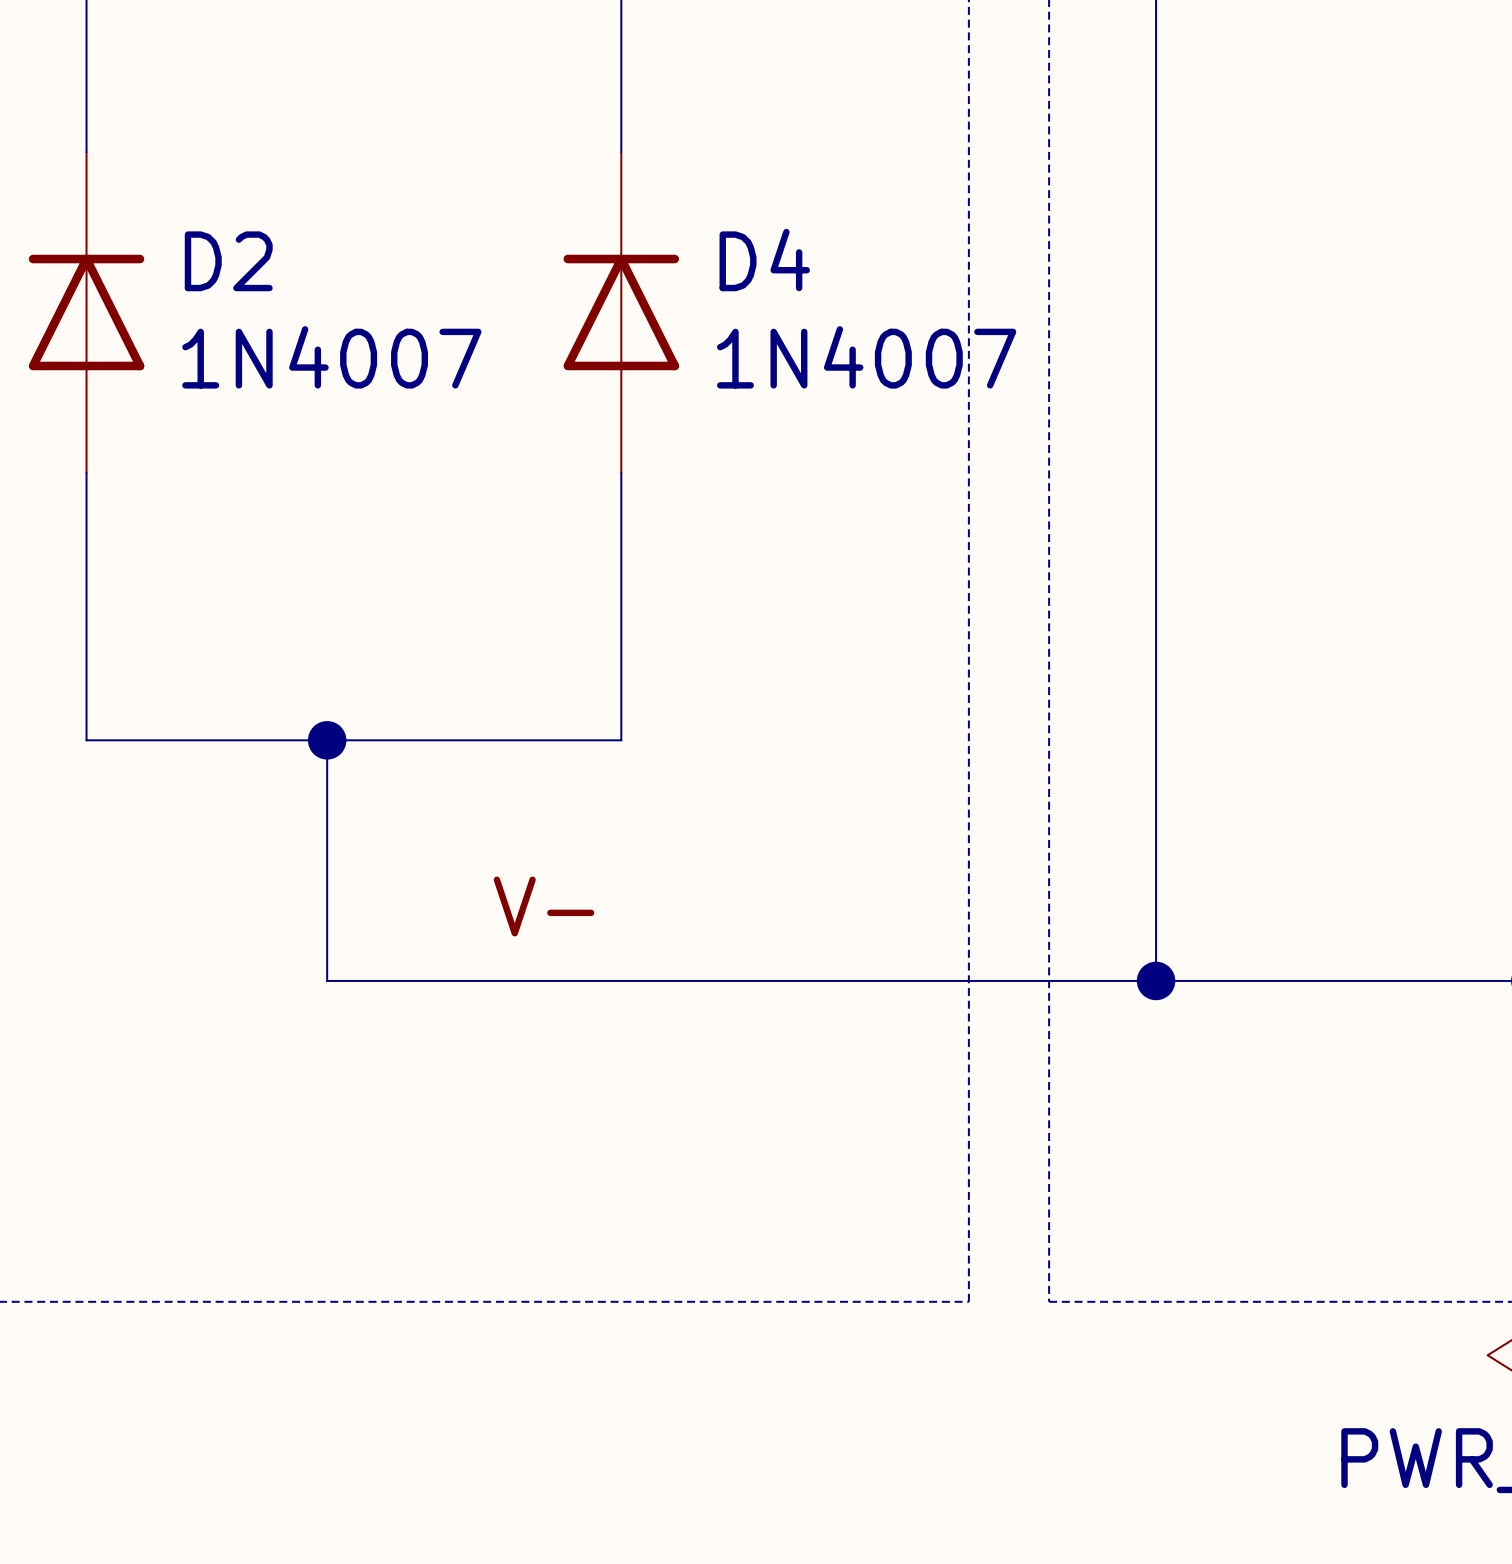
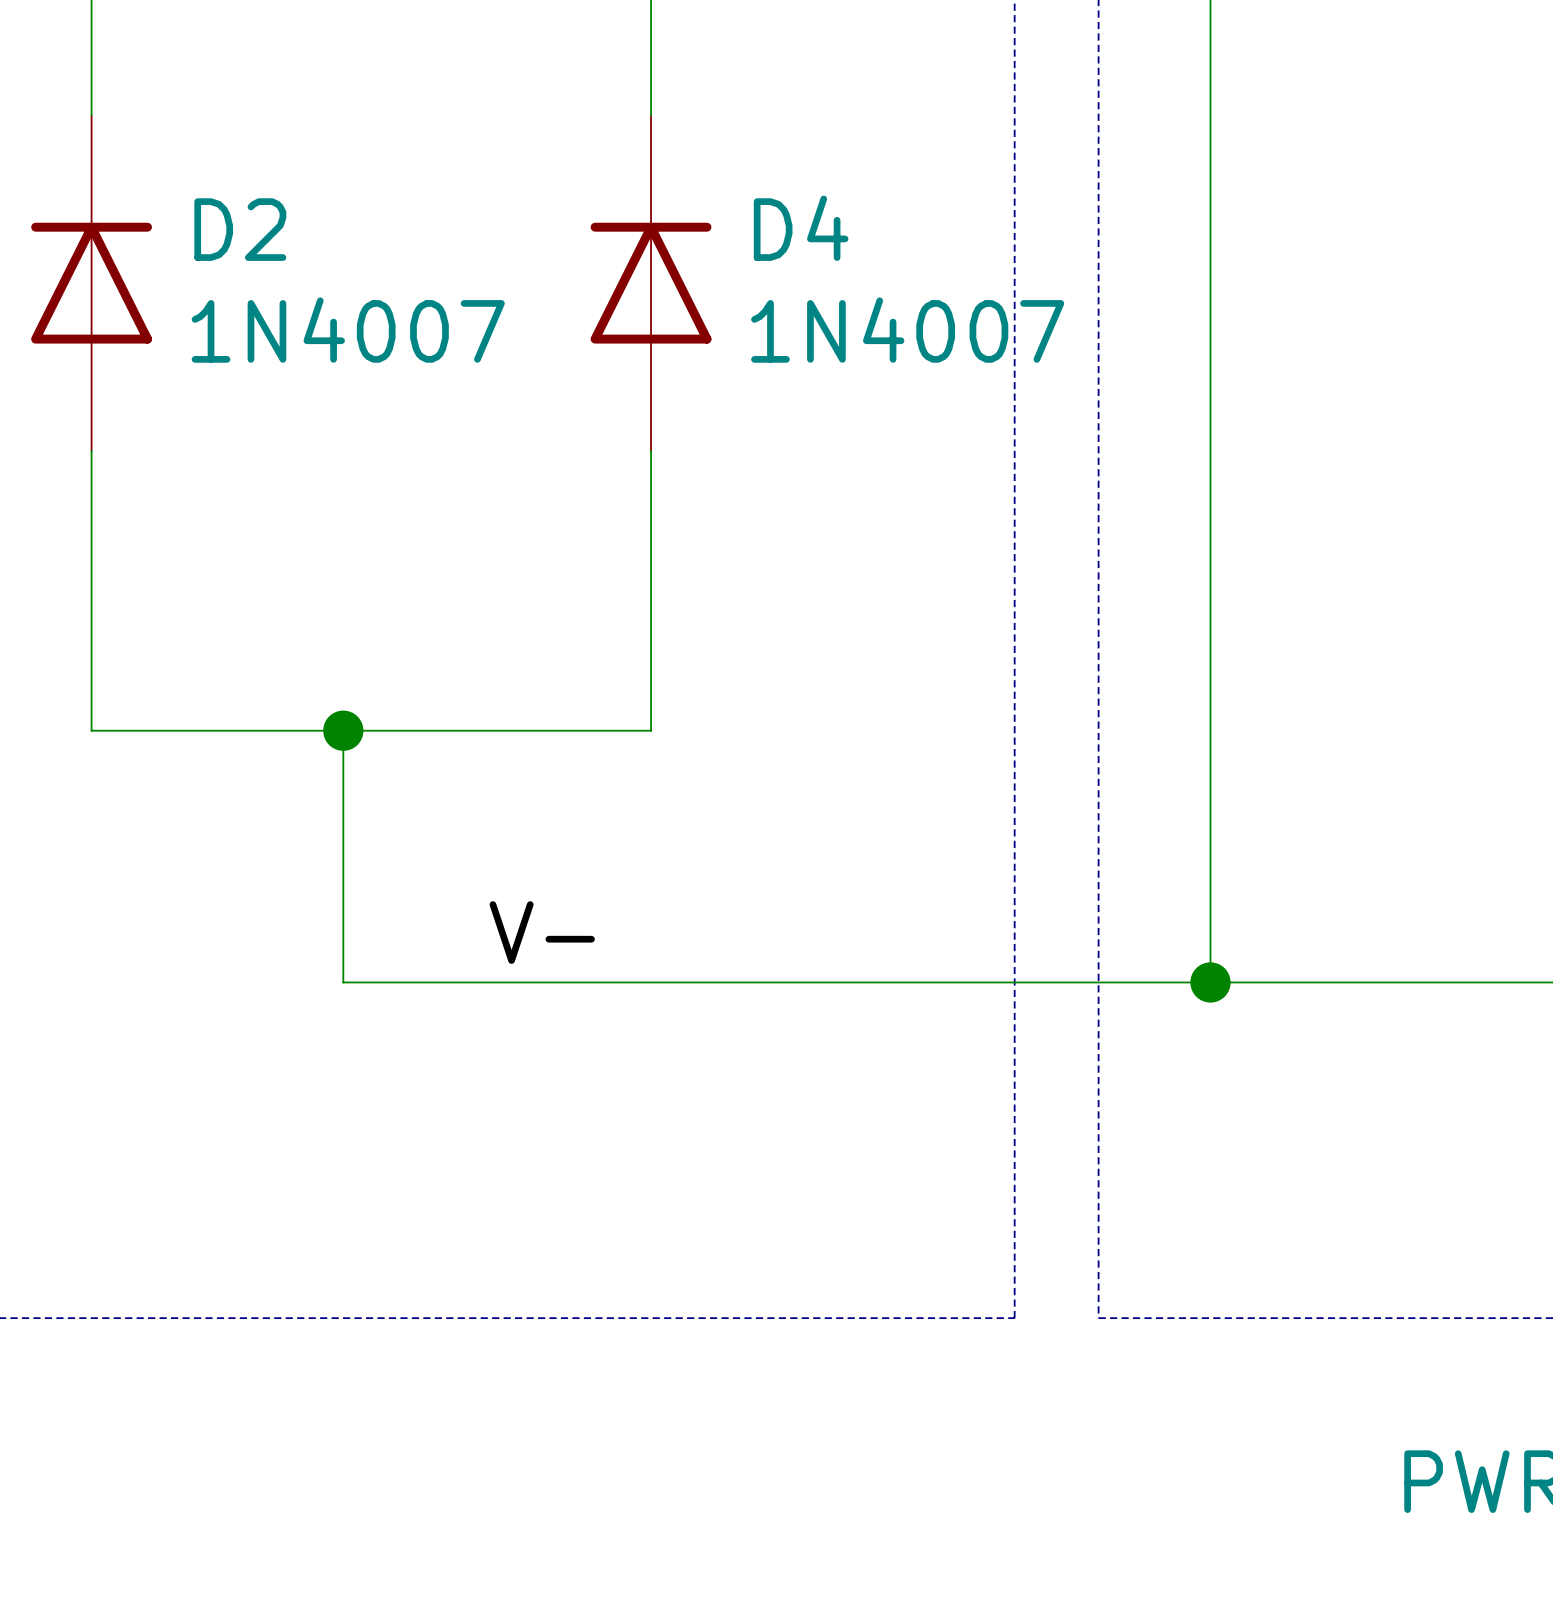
label position: V- (544, 906) -> V- (542, 932)

